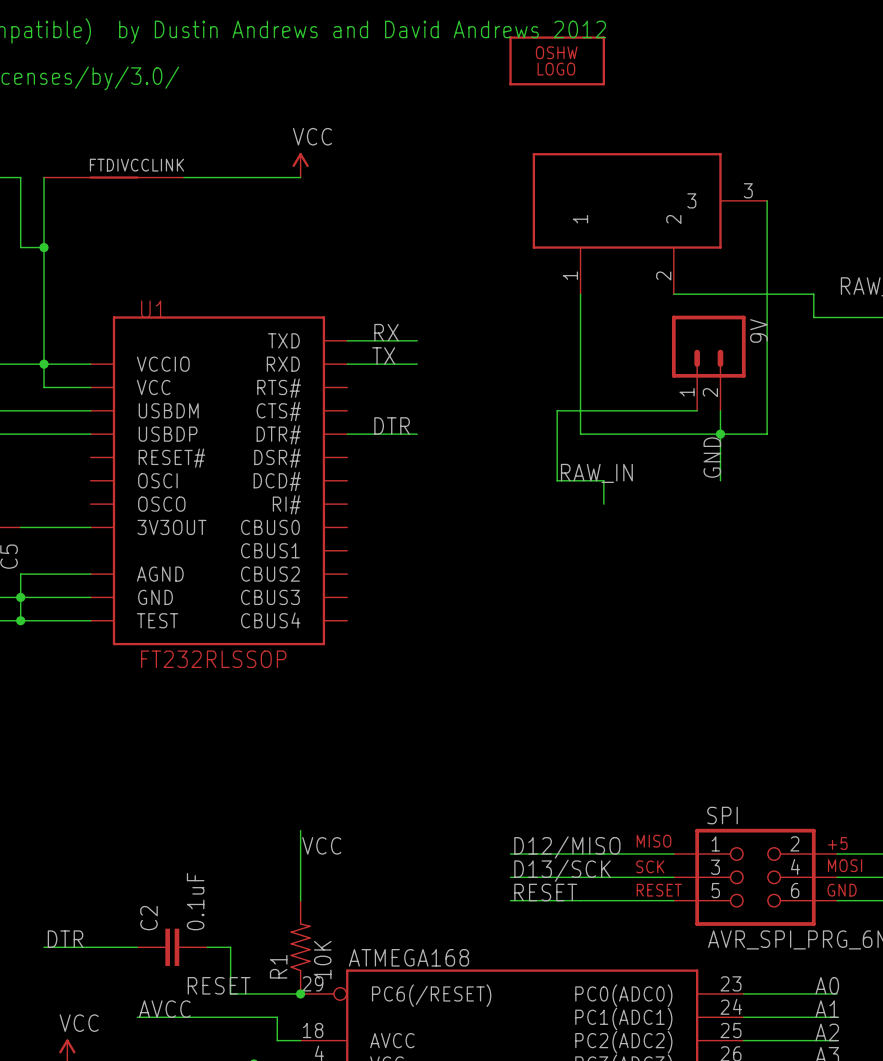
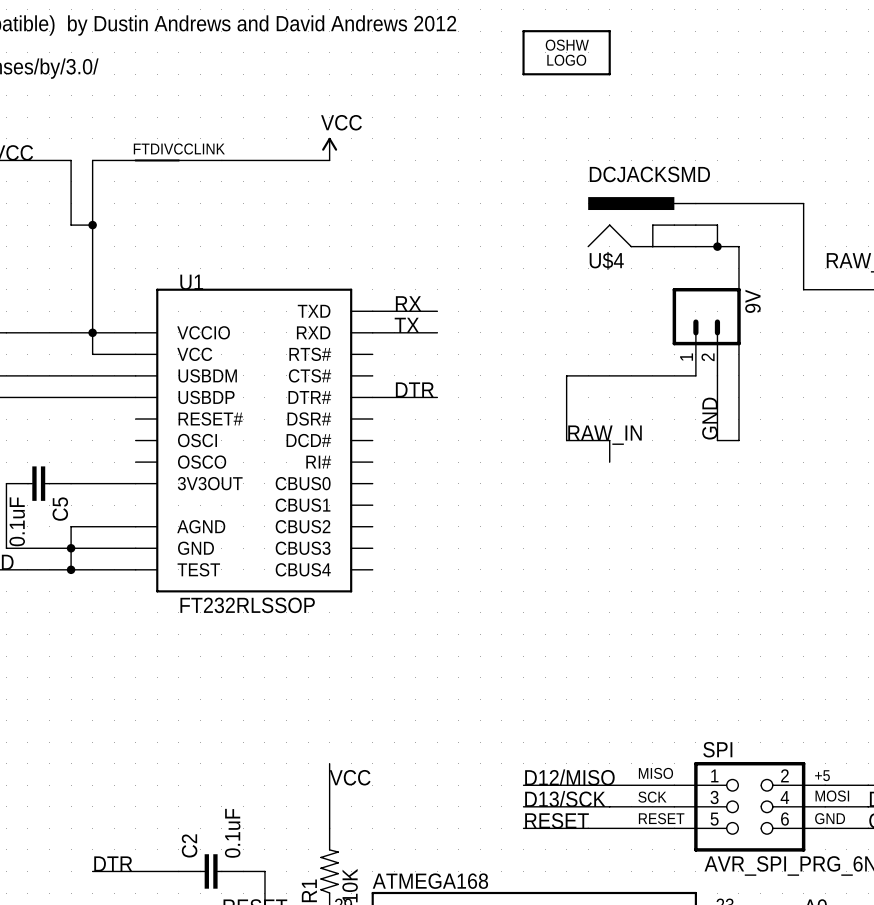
wire: (767, 200) (767, 434) (580, 434) (580, 294) -> none
part: (649, 223) -> none
U$4: none -> DCJACKSMD (641, 222)
wire: none -> (695, 225) (717, 225) (717, 246)
wire: none -> (695, 246) (738, 246) (738, 440) (717, 440)
junction: none -> (717, 246)
wire: (673, 294) (813, 294) -> (695, 203) (803, 203) (803, 268)
junction: (720, 434) -> none

